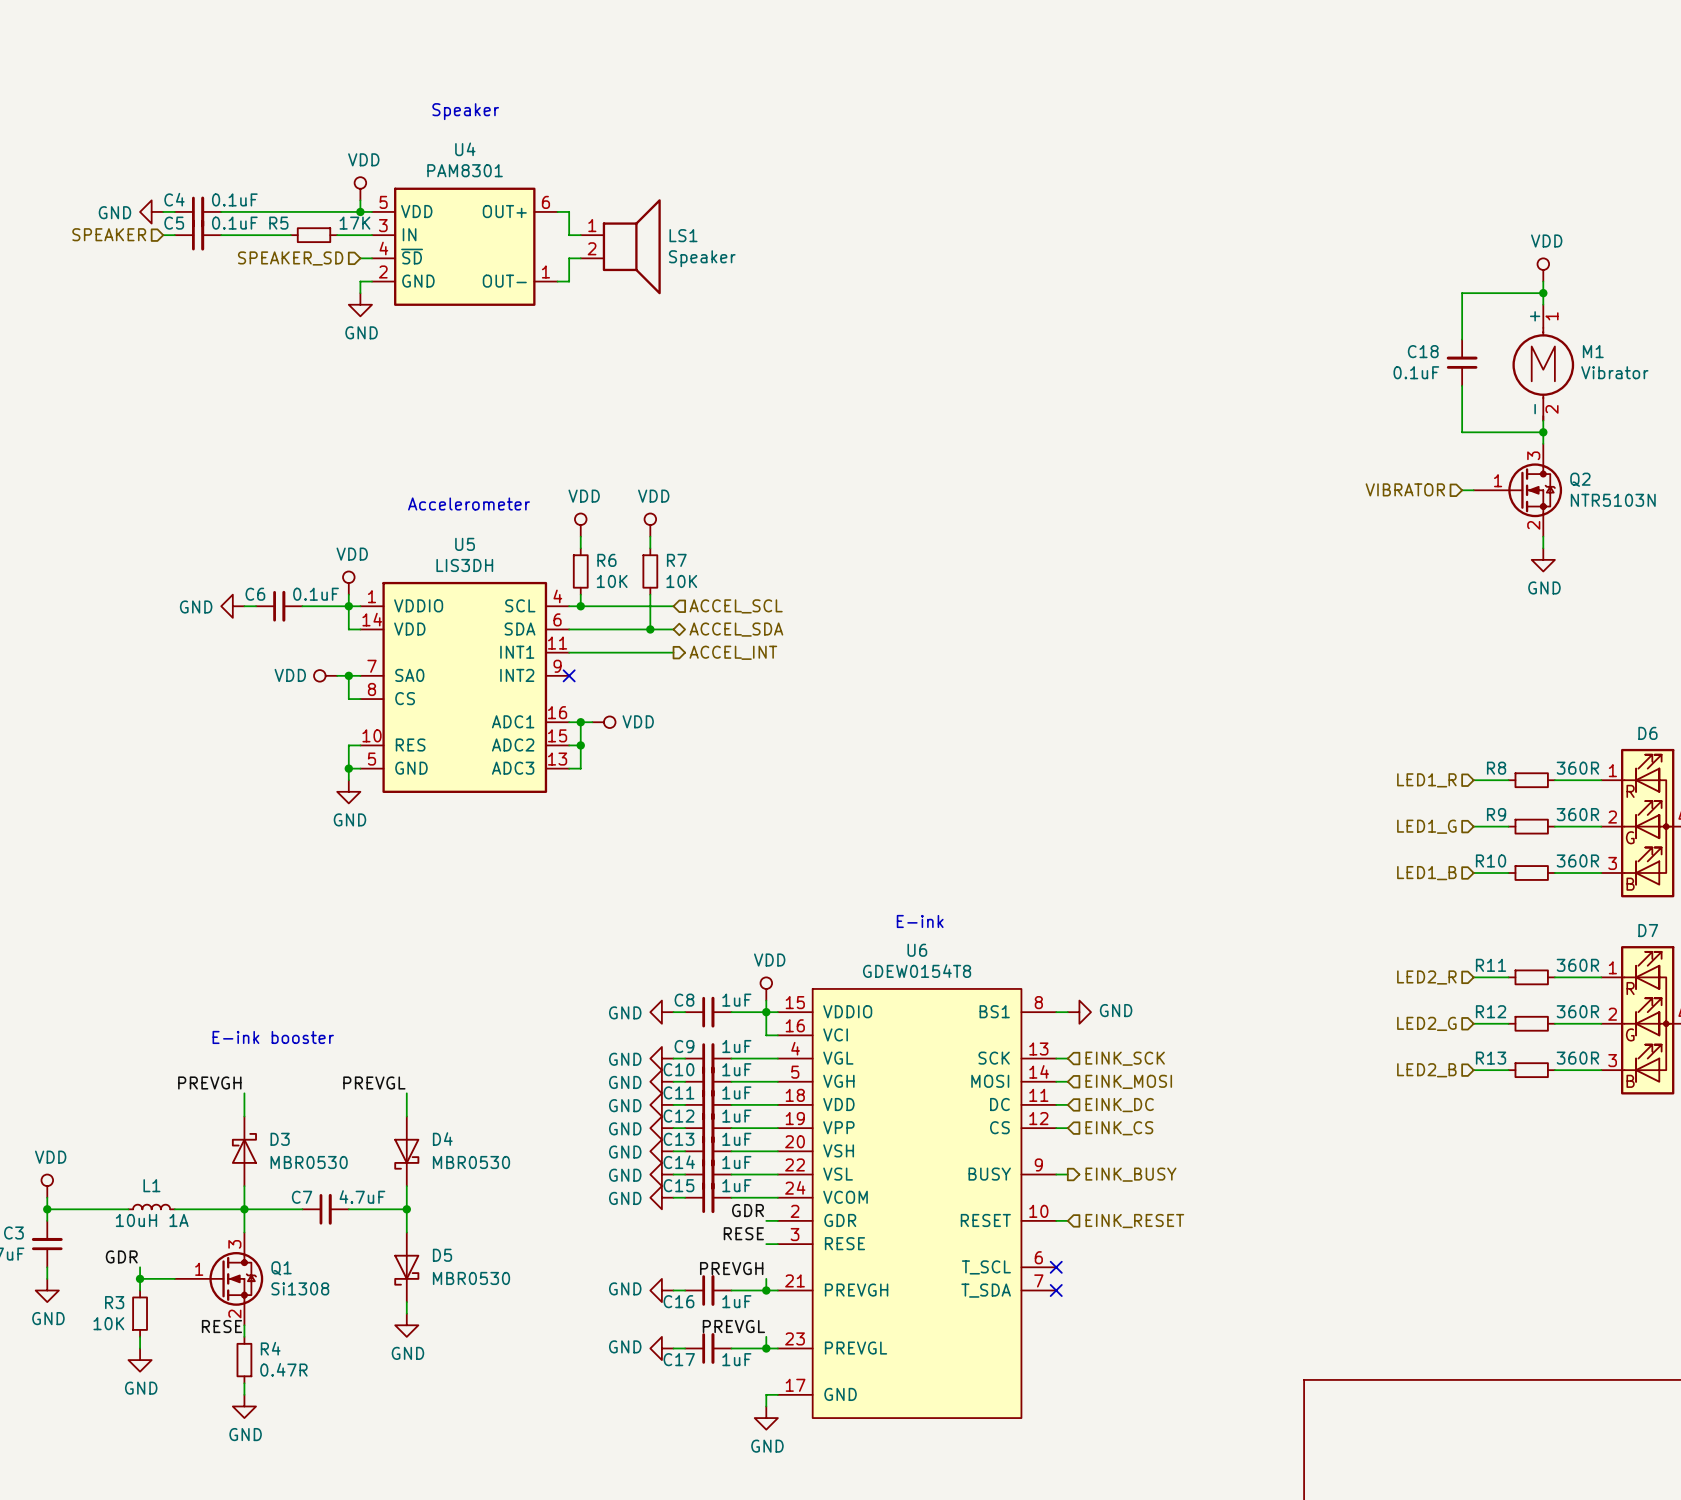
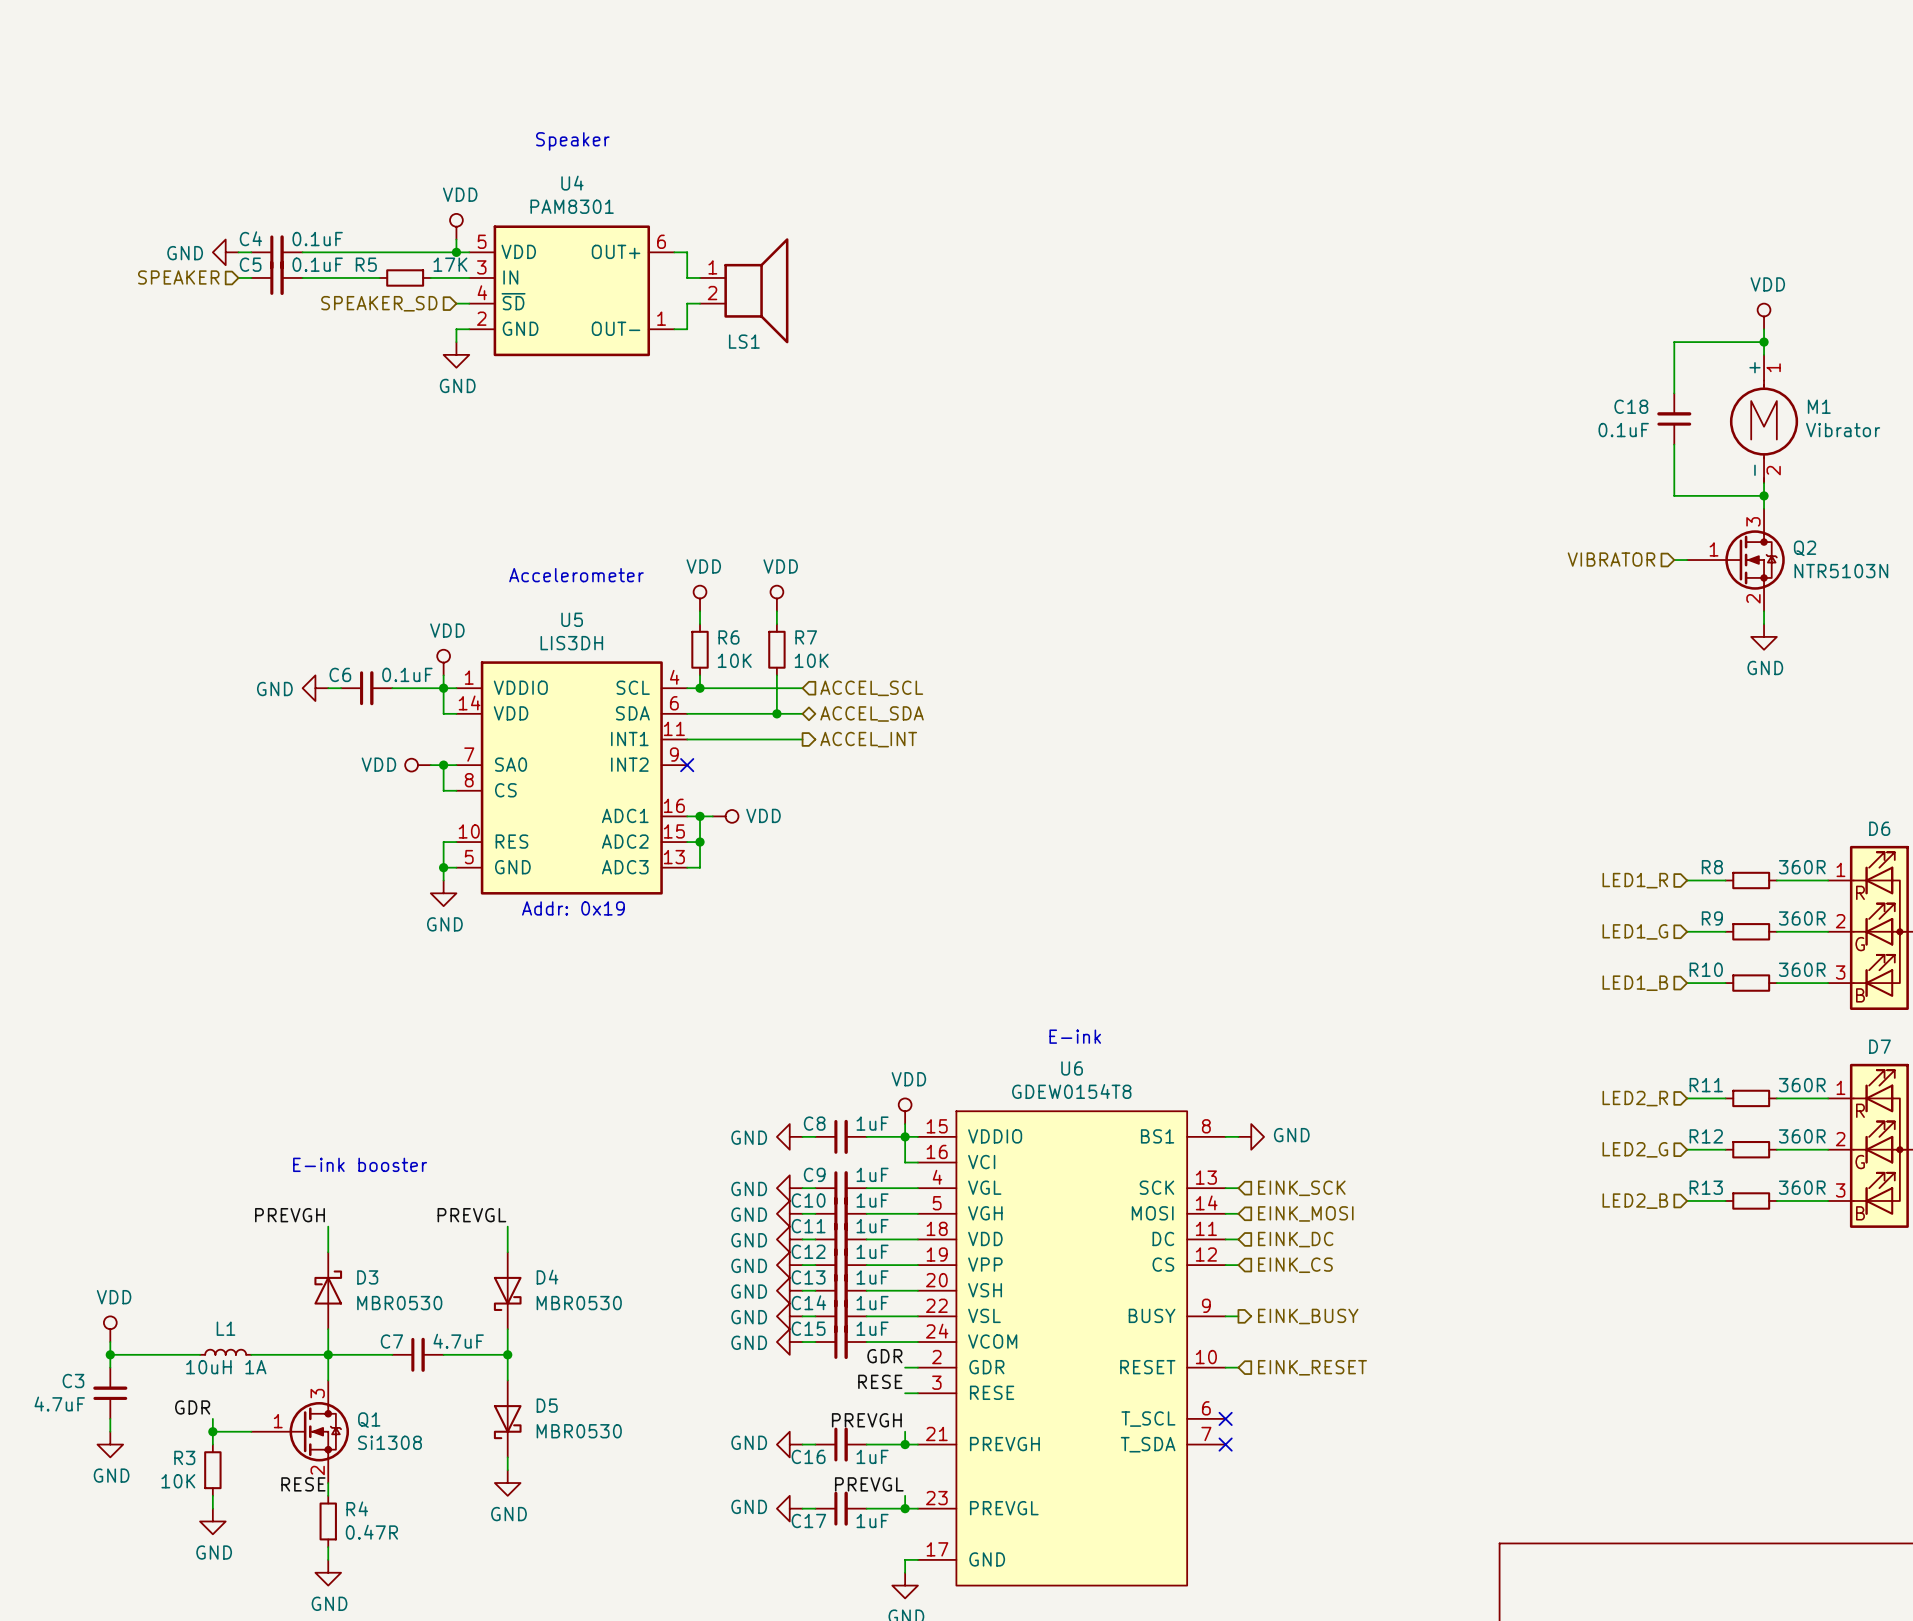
LS1 name position: LS1 (683, 235) -> LS1 (744, 341)
LS1 value: Speaker (702, 258) -> none
text: none -> Addr: 0x19 (573, 908)

